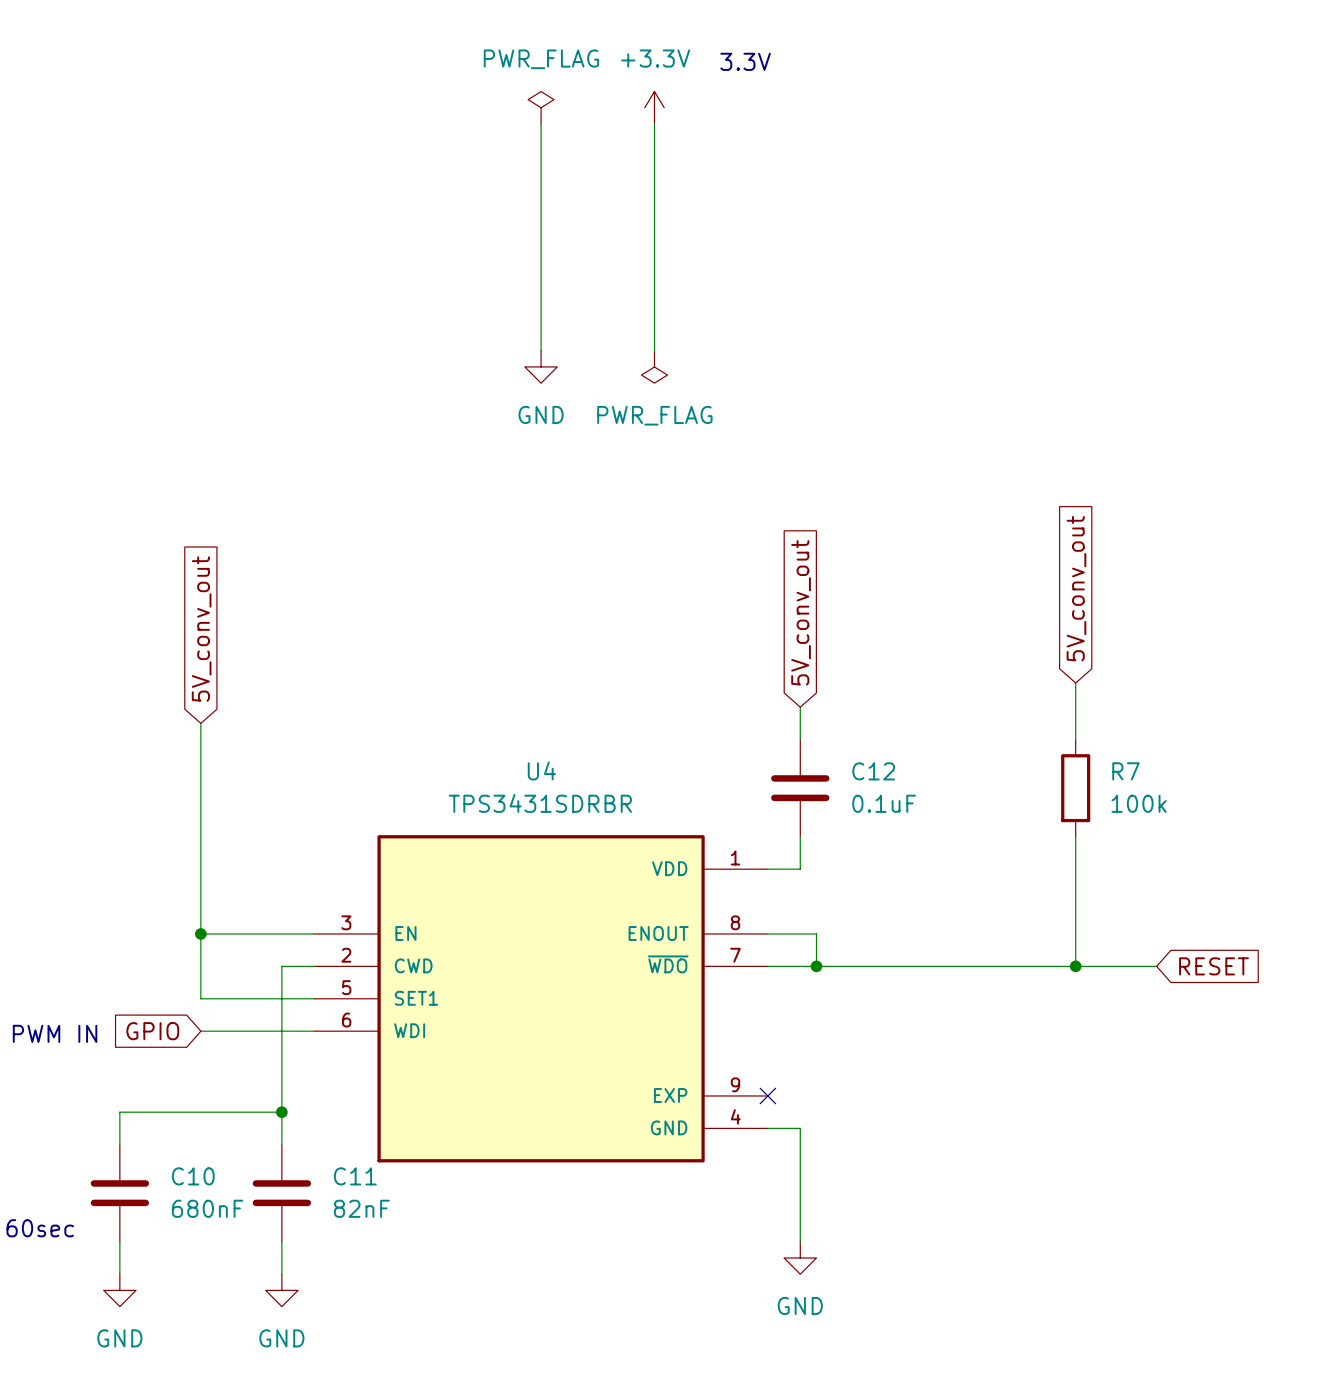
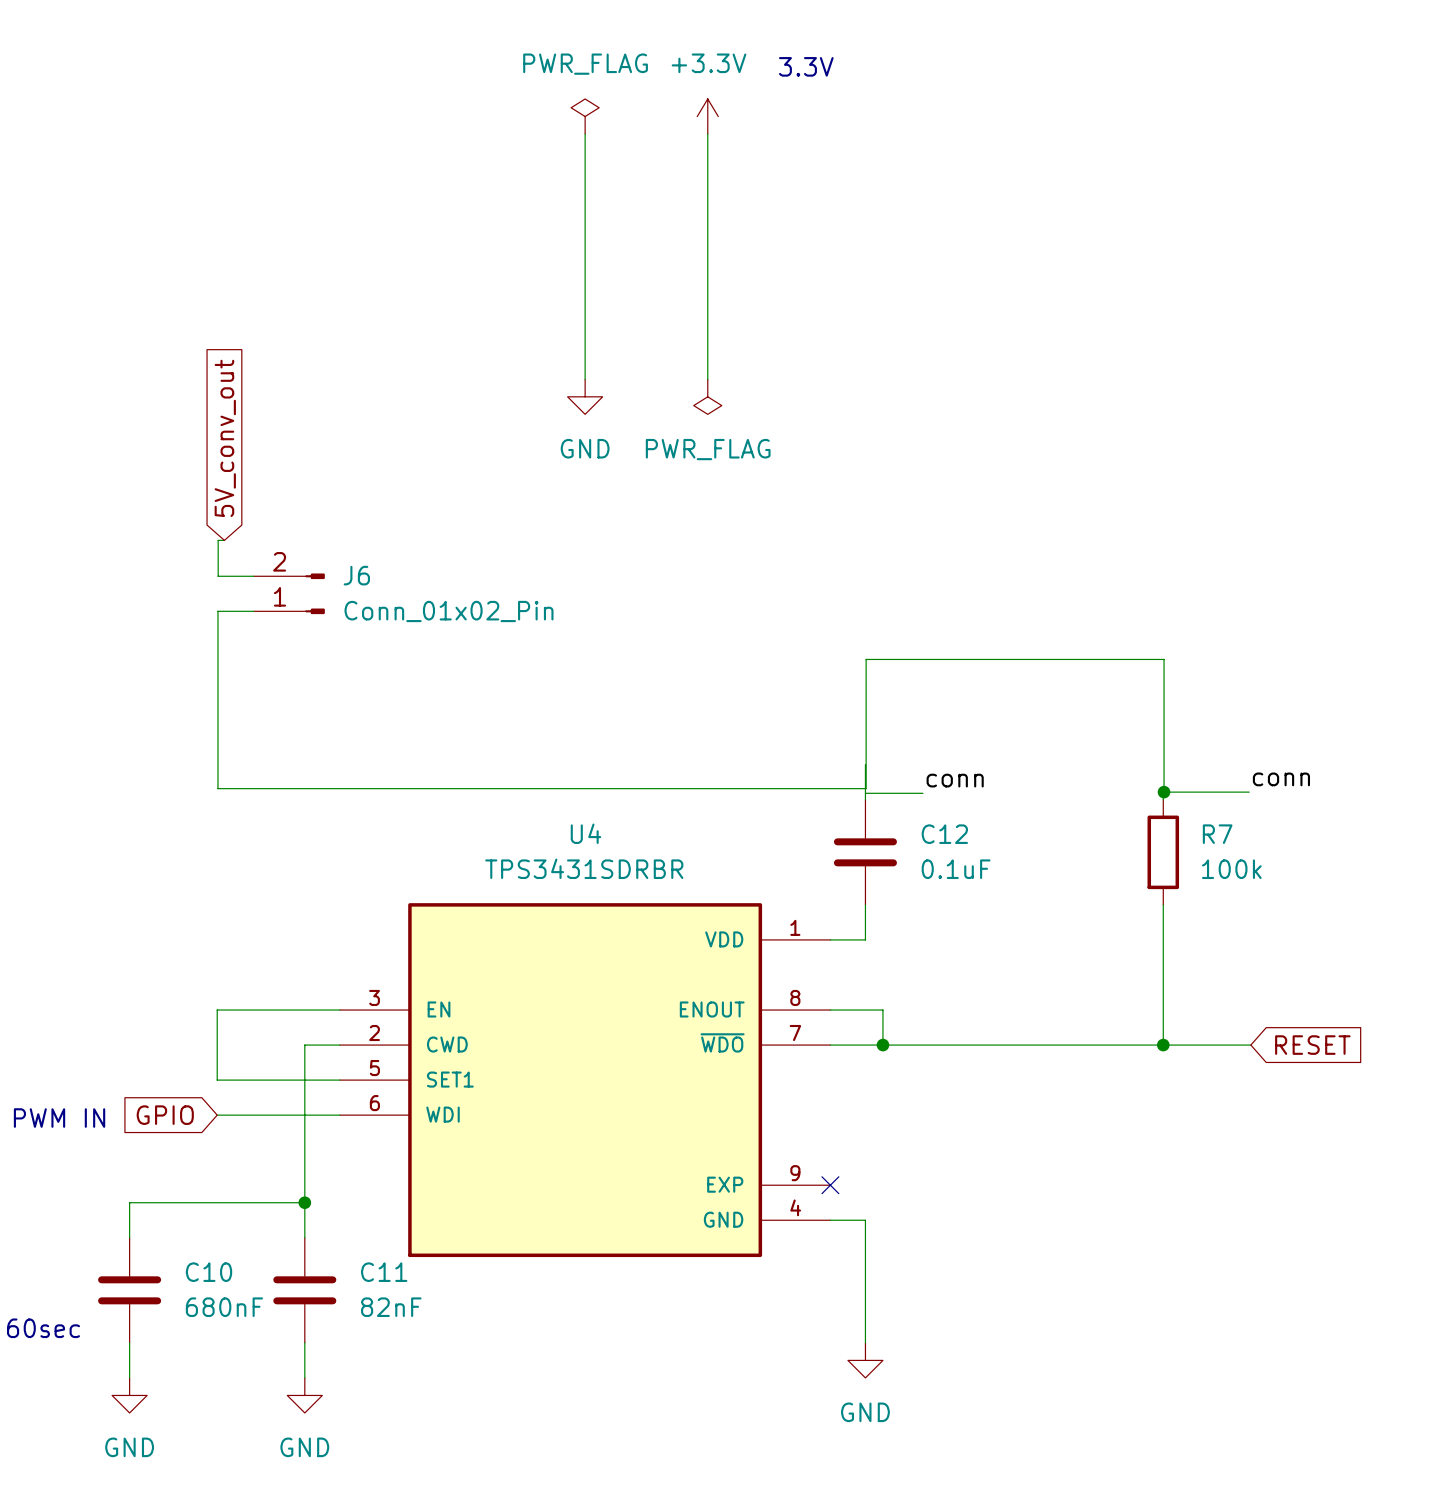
wire: none -> (224, 540) (218, 540) (218, 576) (253, 576)
J6: none -> Conn_01x02_Pin (289, 593)
wire: none -> (253, 611) (217, 611) (217, 788) (866, 788) (866, 659) (1164, 659) (1164, 792)
global label: 5V_conv_out (1076, 588) -> none
global label: 5V_conv_out (801, 612) -> none
global label position: 5V_conv_out (201, 629) -> 5V_conv_out (225, 438)
wire: (1075, 682) (1075, 732) -> (1249, 792) (1163, 792)
label: none -> conn (1281, 779)
label: none -> conn (955, 780)
wire: (200, 723) (200, 933) -> none
junction: none -> (1164, 792)
wire: none -> (865, 793) (922, 793)
junction: (200, 933) -> none

